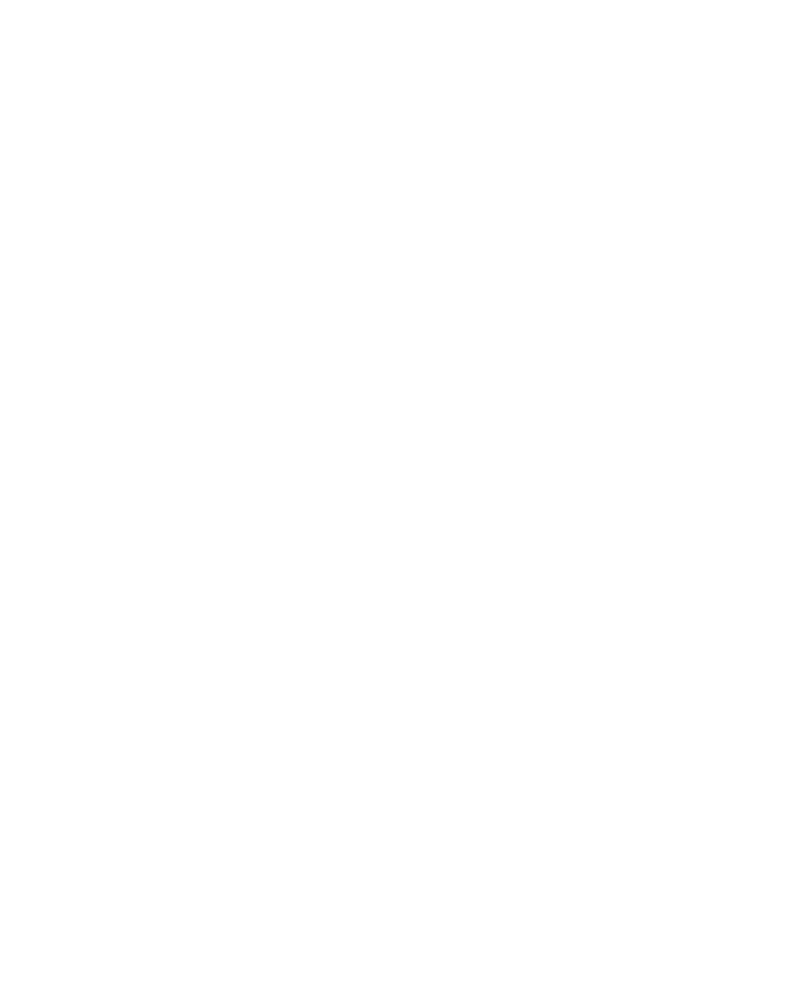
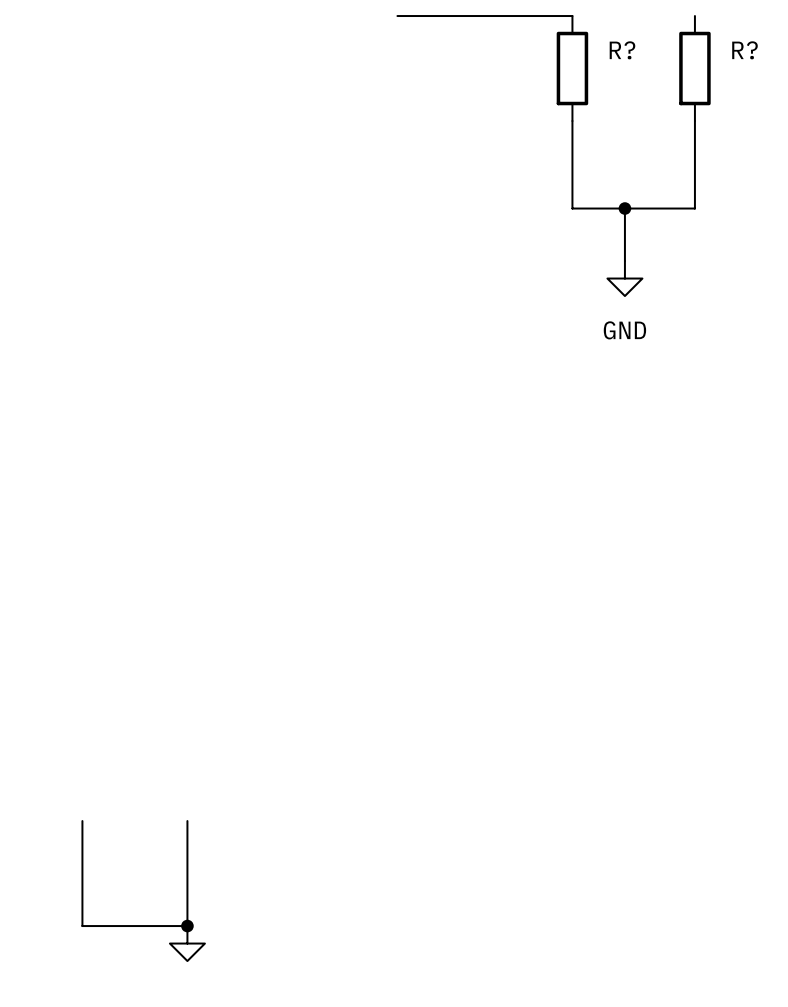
wire: none -> (397, 16) (572, 16)
R?: none -> (572, 68)
R?: none -> (694, 68)
wire: none -> (572, 121) (572, 208) (694, 208) (694, 121)
wire: none -> (624, 208) (624, 261)
junction: none -> (624, 208)
power symbol: none -> GND (624, 278)
wire: none -> (82, 821) (82, 926) (187, 926) (187, 821)
junction: none -> (187, 926)
power symbol: none -> (187, 943)

